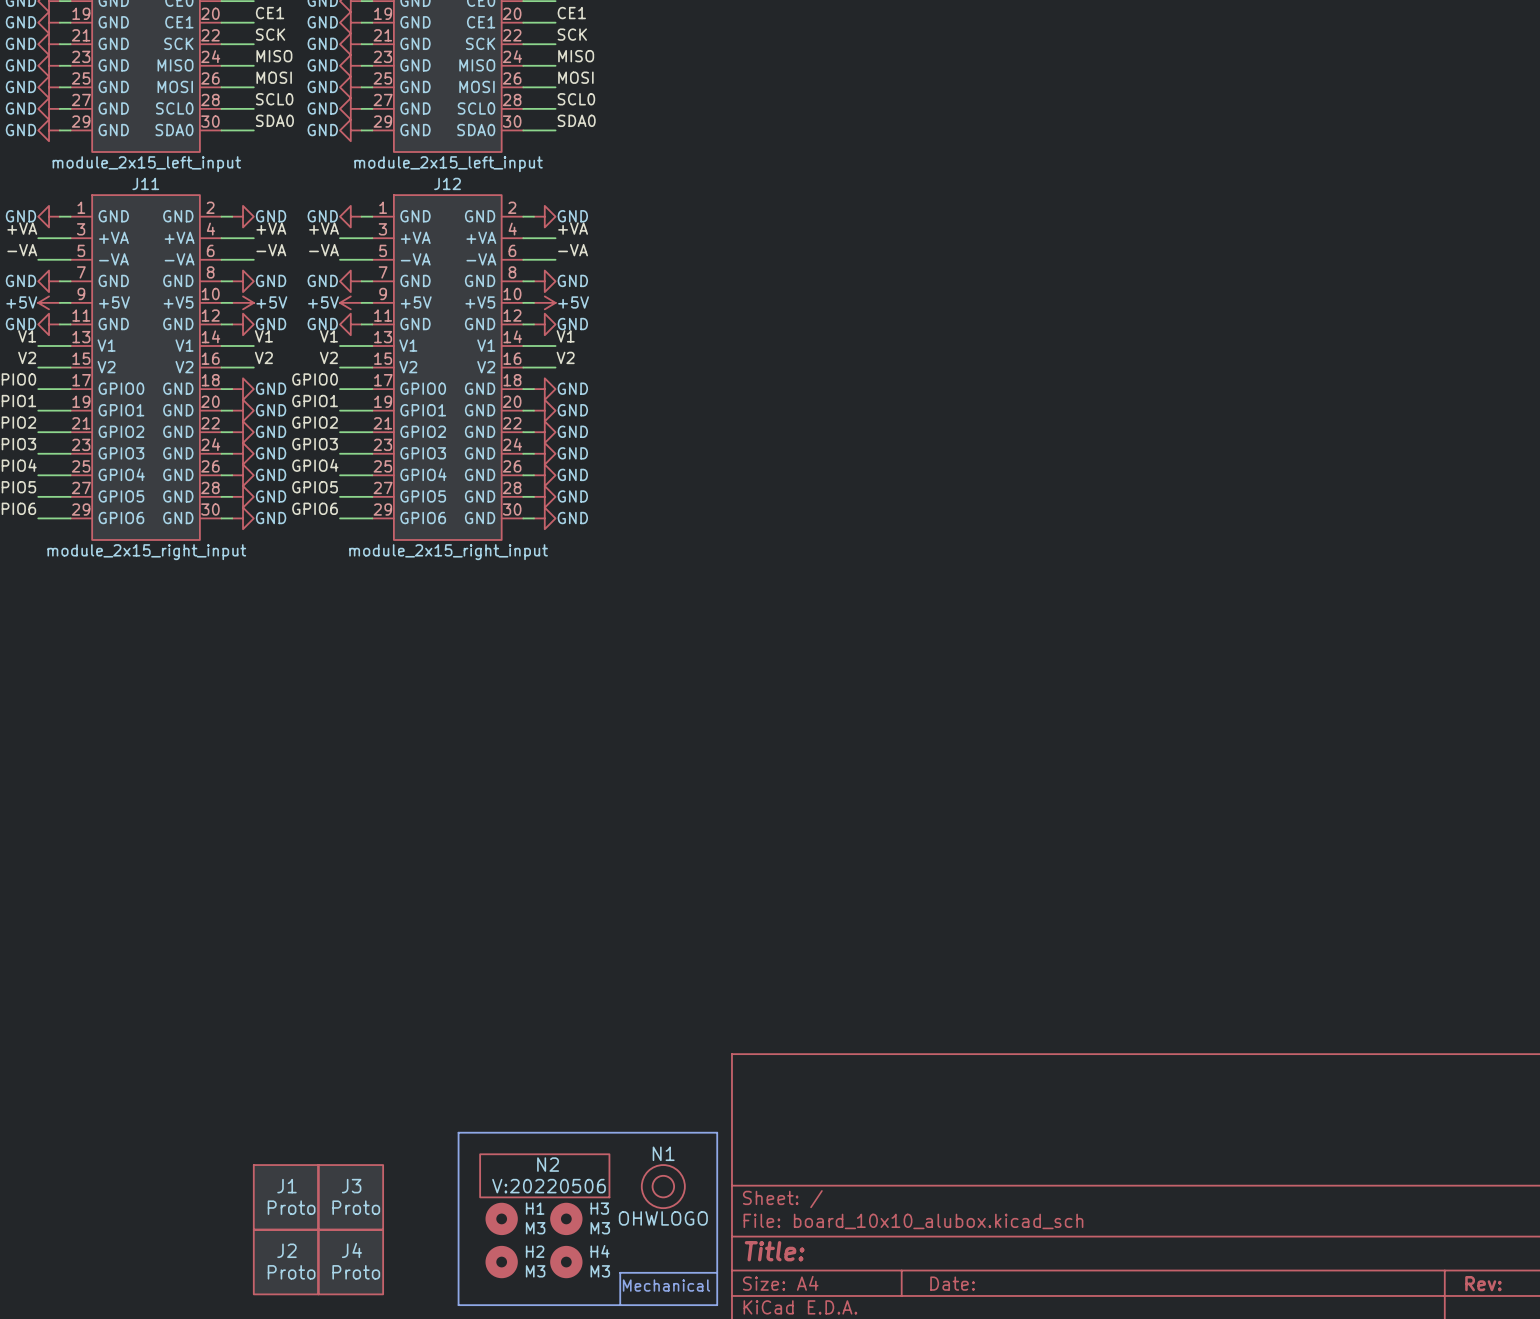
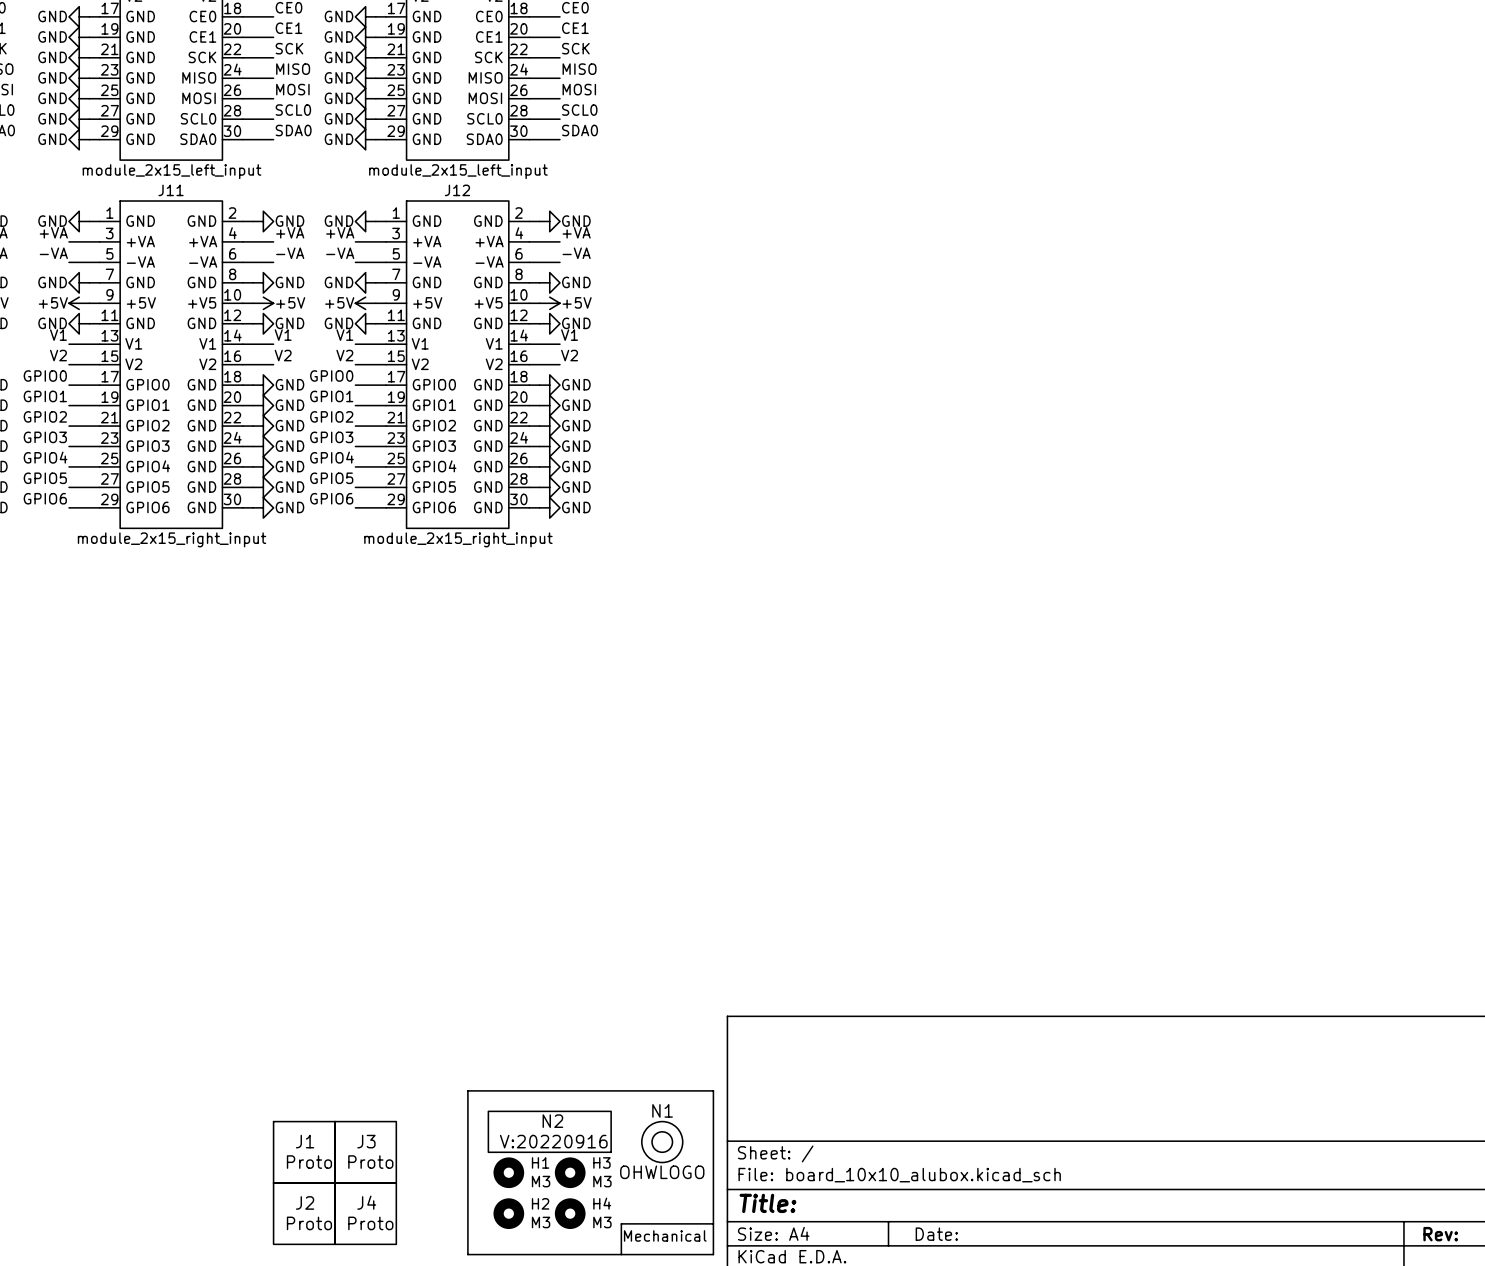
N2 value: V:20220506 (549, 1186) -> V:20220916 (553, 1141)

